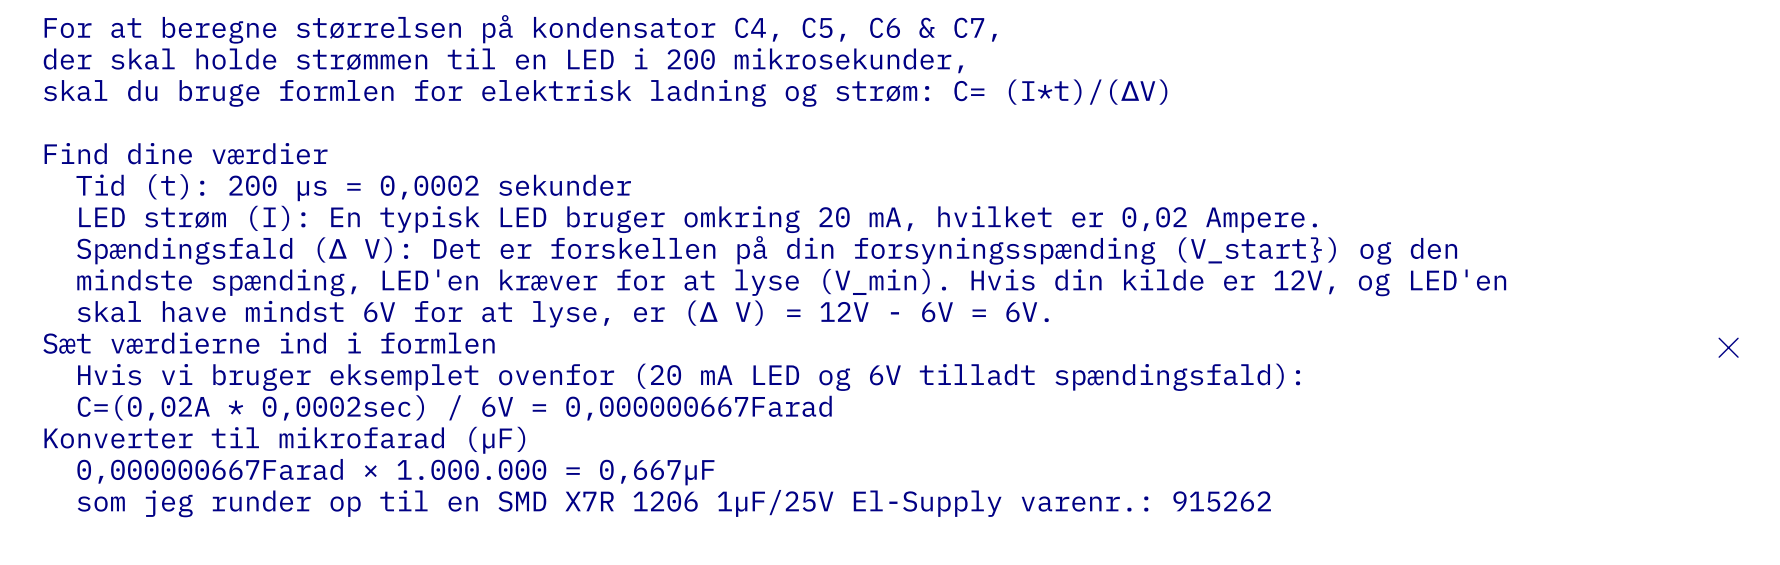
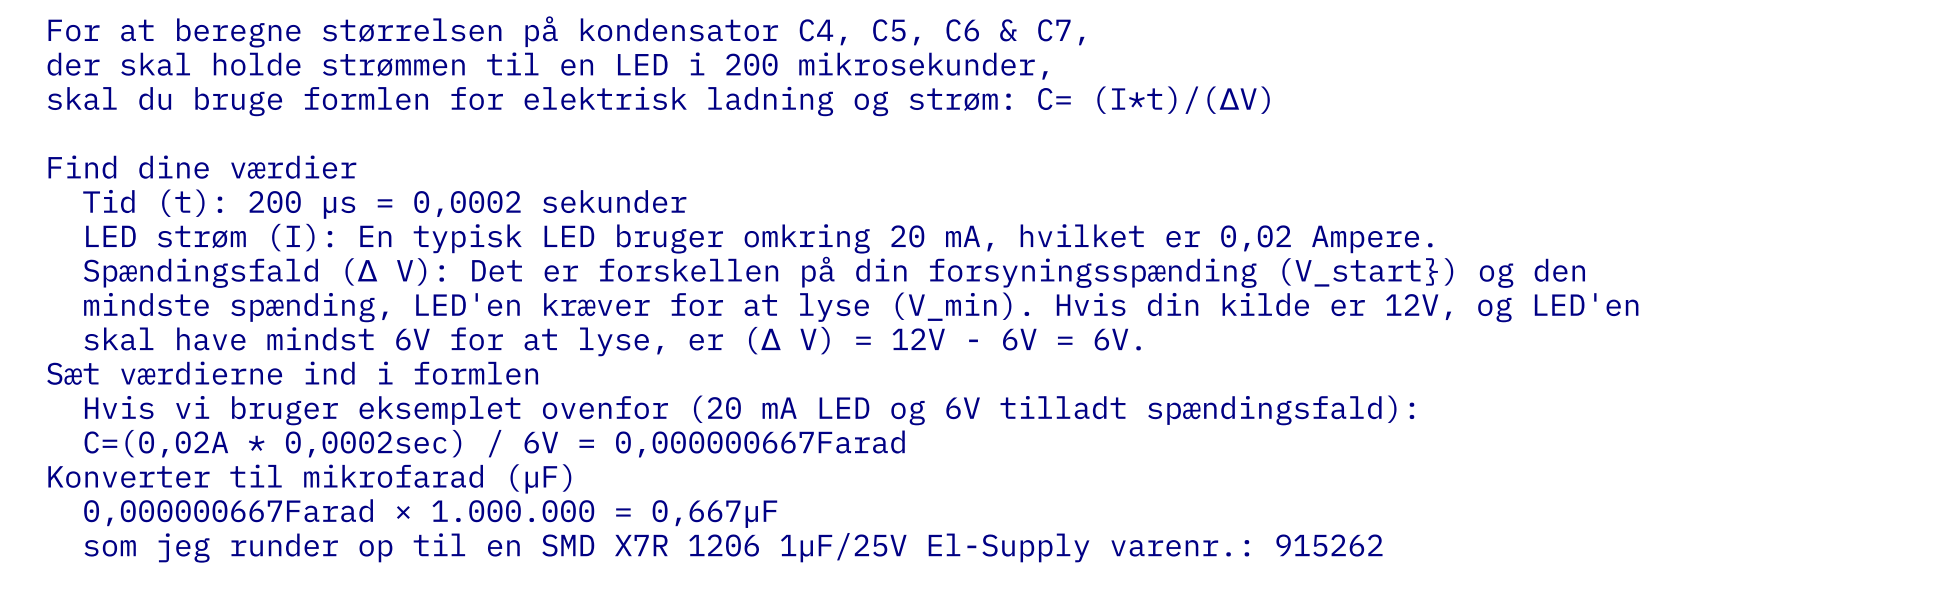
no-connect mark: (1728, 347) -> none

